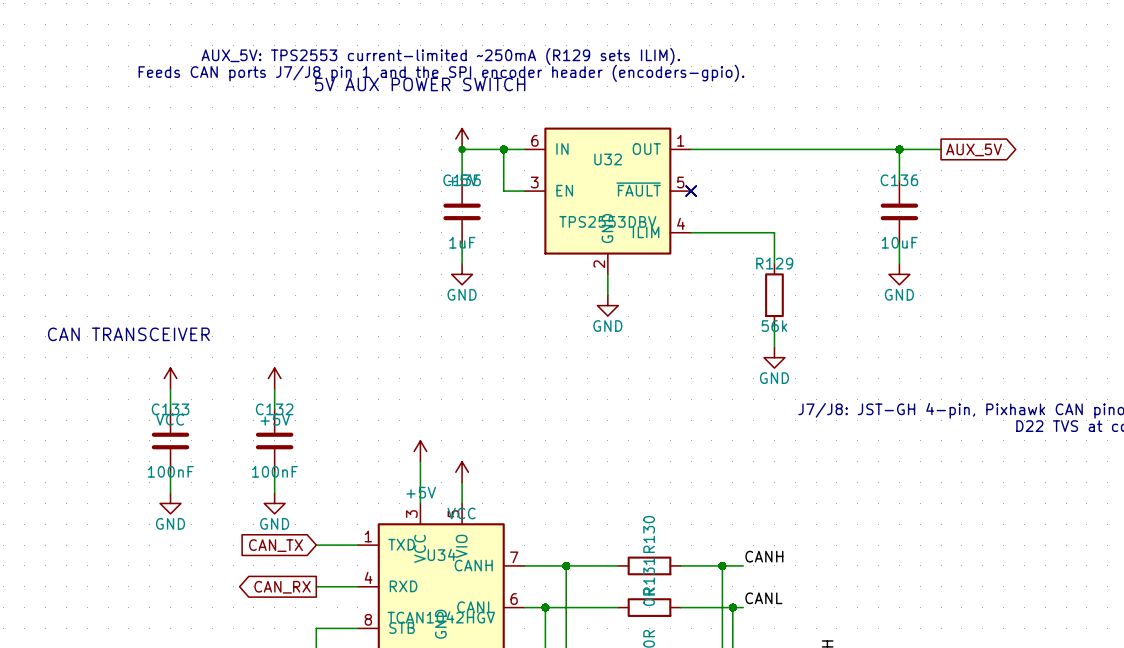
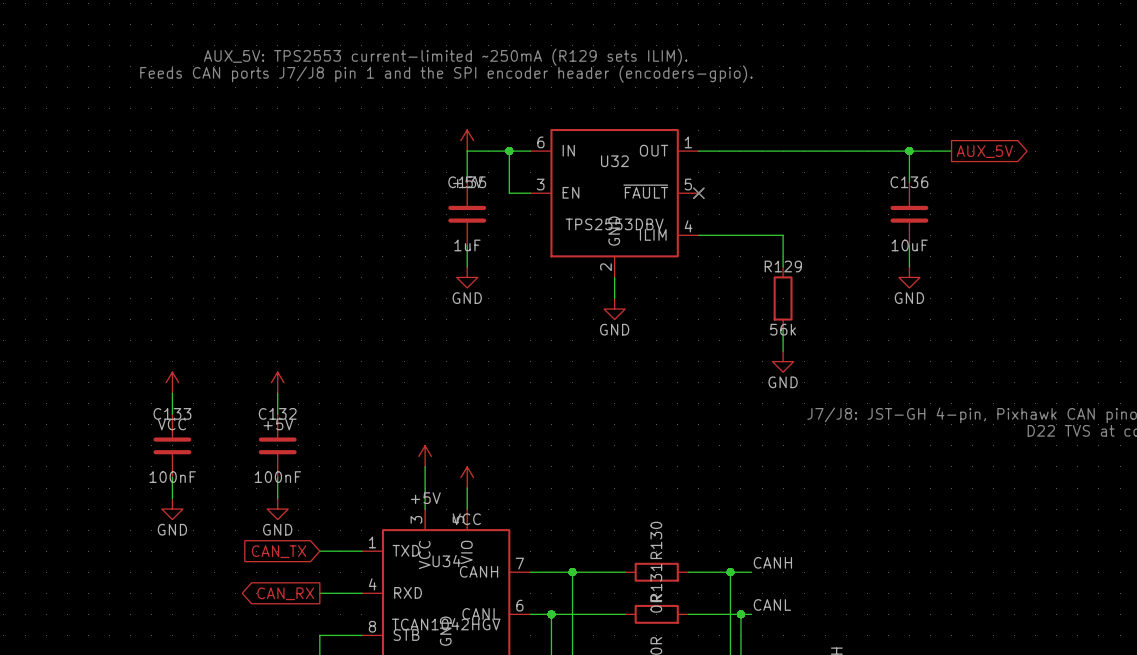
text: 5V AUX POWER SWITCH (420, 84) -> none
junction: (462, 149) -> none
text: CAN TRANSCEIVER (128, 334) -> none

